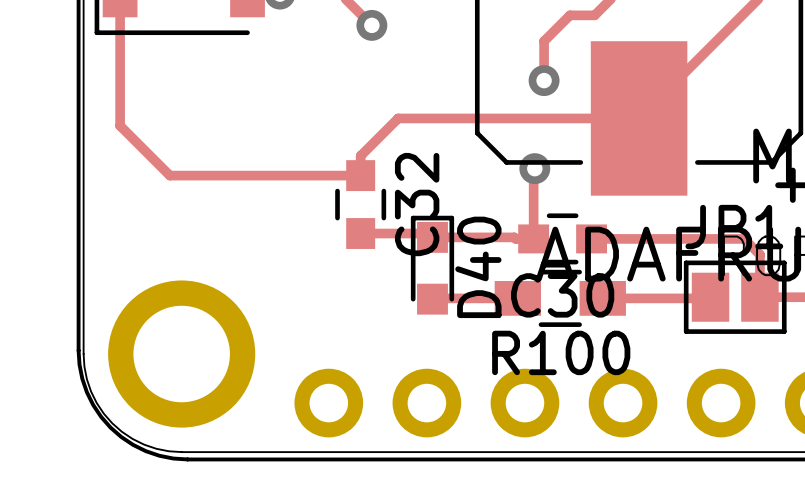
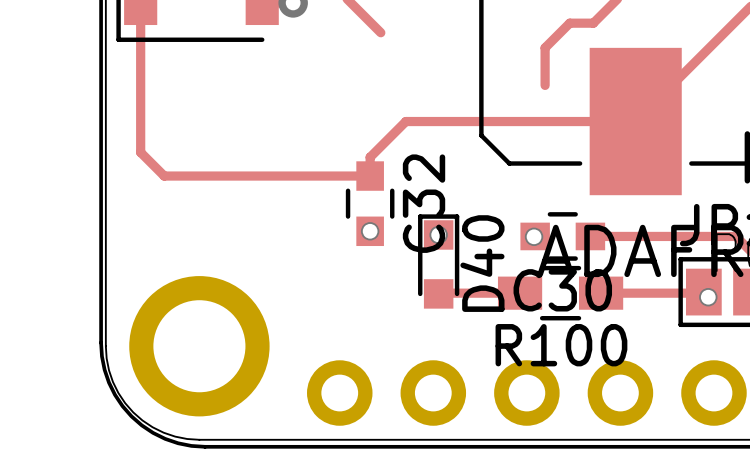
via: (371, 25) -> none
via: (544, 80) -> none
track: (120, 125) (169, 175) -> (140, 128) (140, 152) (164, 176) (188, 176)
track: (534, 168) (533, 238) (432, 237) (428, 233) (360, 233) -> none
via: (534, 168) -> none
via: none -> (370, 231)
via: none -> (438, 234)
via: none -> (534, 236)
via: none -> (708, 297)

